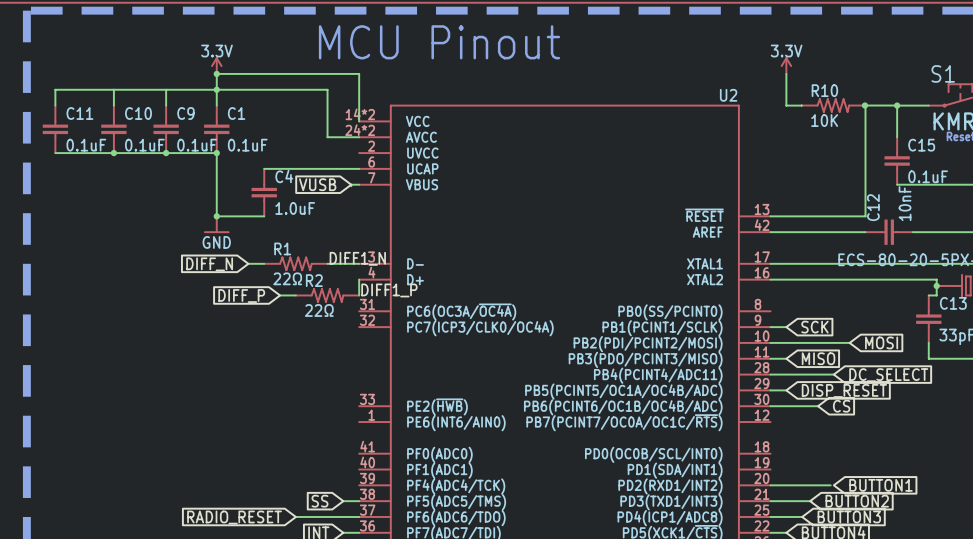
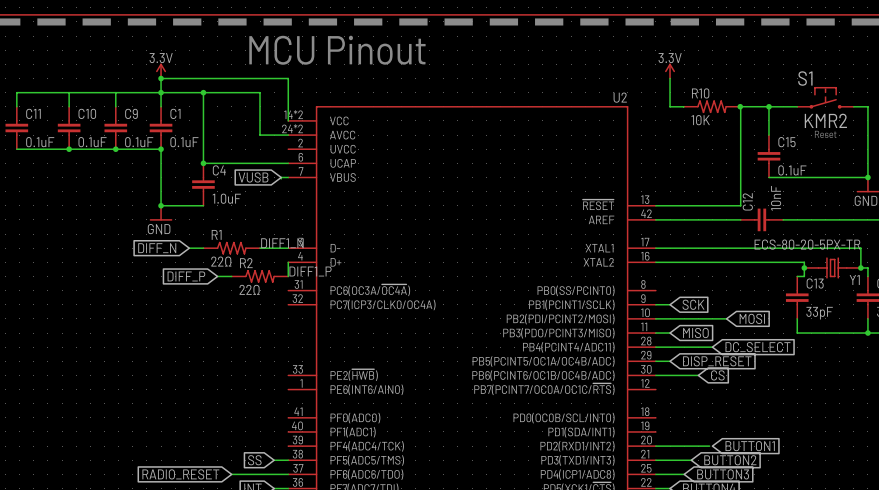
wire: none -> (203, 92) (203, 163)
junction: none -> (203, 92)
junction: none -> (203, 163)

